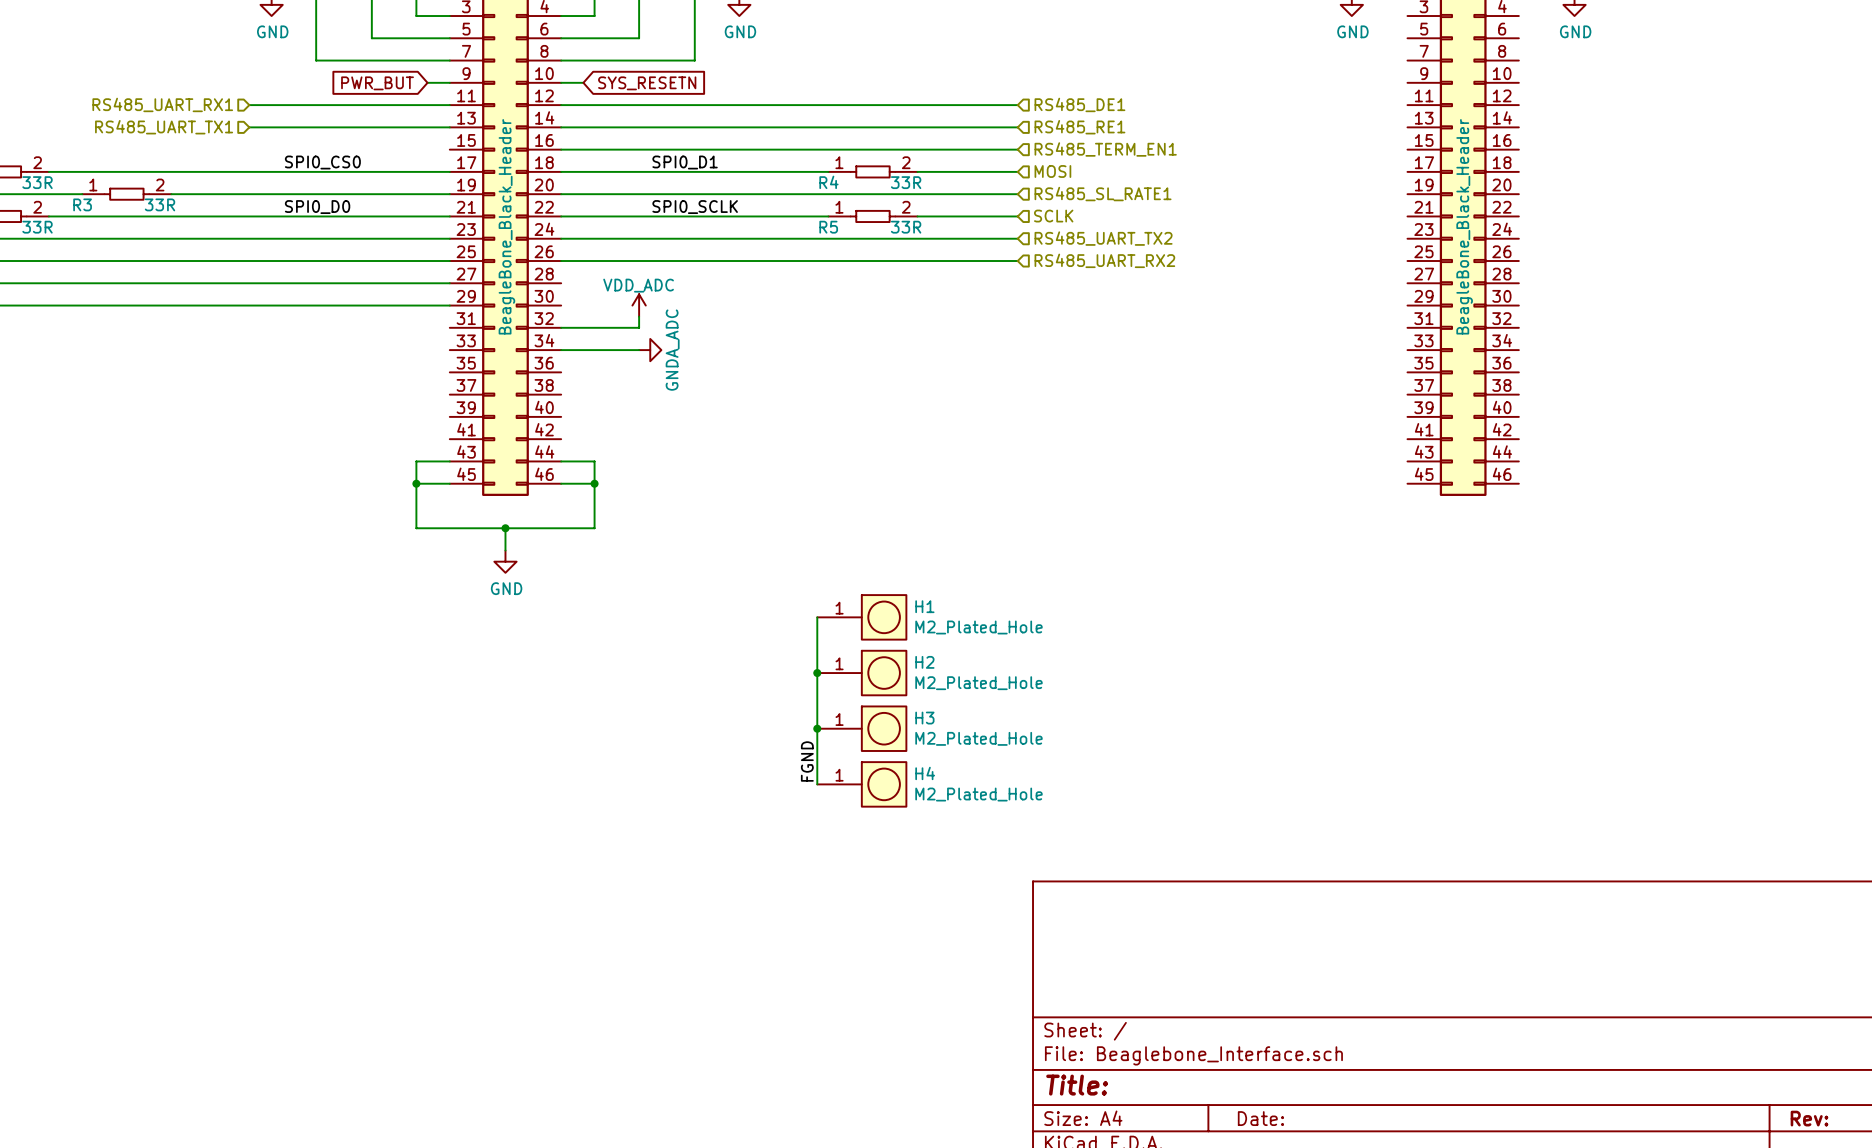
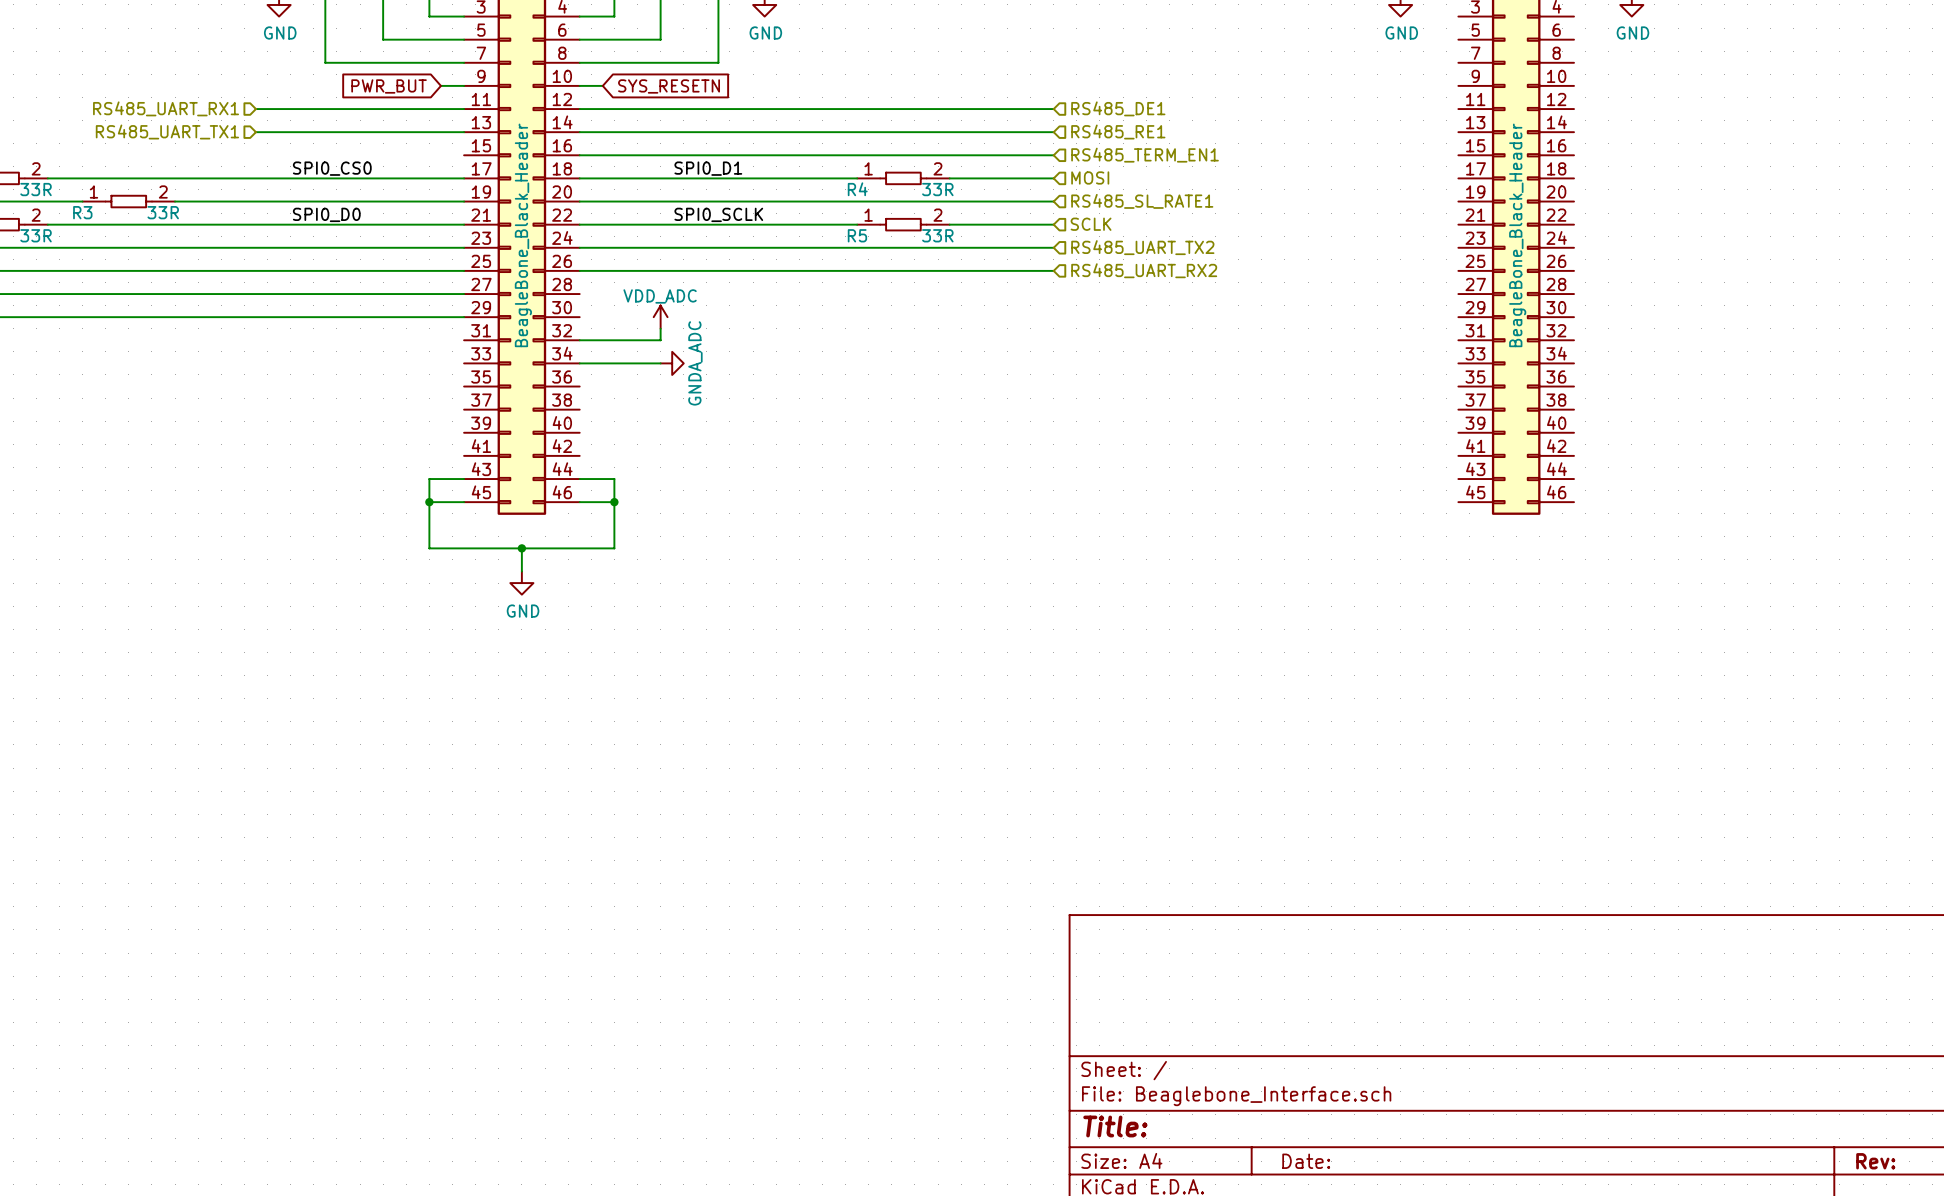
wire: (817, 617) (817, 784) -> none
H1: M2_Plated_Hole (861, 617) -> none
junction: (817, 673) -> none
H2: M2_Plated_Hole (861, 673) -> none
junction: (817, 728) -> none
H3: M2_Plated_Hole (861, 728) -> none
label: FGND (807, 761) -> none
H4: M2_Plated_Hole (861, 784) -> none

